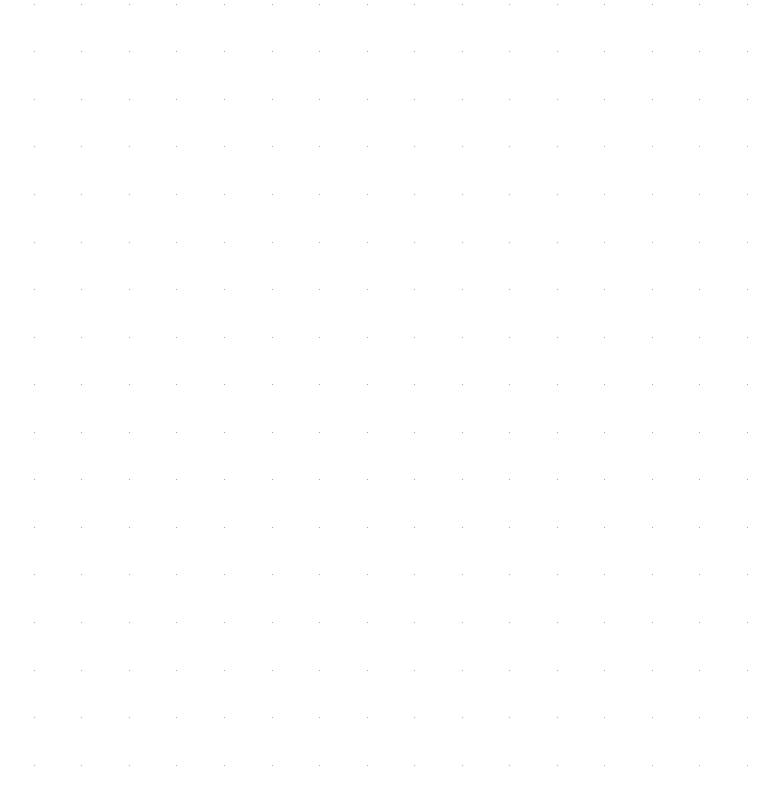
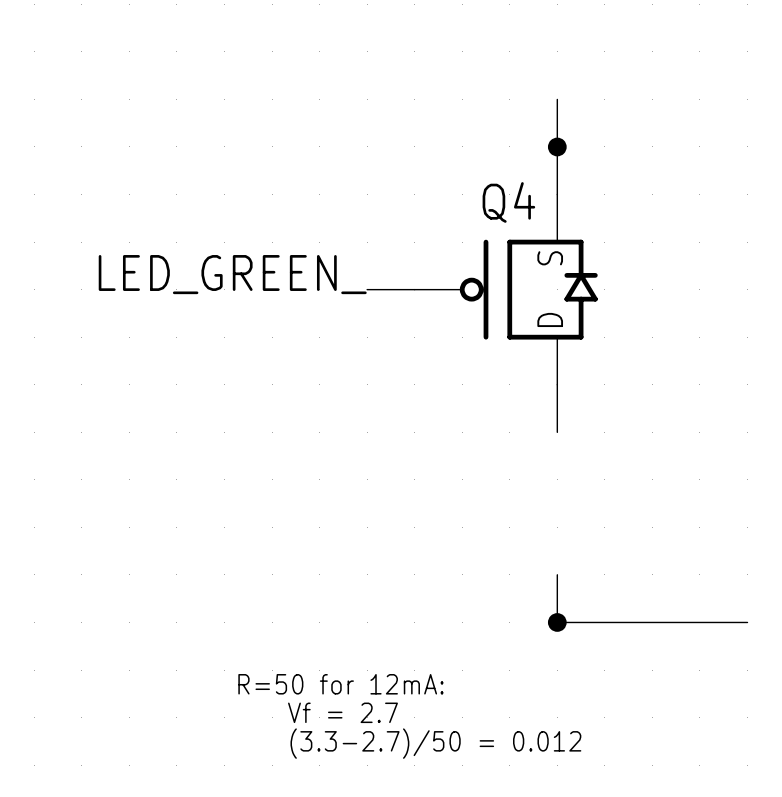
wire: none -> (557, 99) (557, 194)
junction: none -> (557, 146)
label: none -> LED_GREEN_ (232, 274)
wire: none -> (367, 289) (414, 289)
Q4: none -> (506, 289)
wire: none -> (557, 384) (557, 432)
wire: none -> (557, 574) (557, 622) (747, 622)
junction: none -> (557, 622)
text: none -> R=50 for 12mA: (340, 684)
text: none -> Vf = 2.7 (342, 712)
text: none -> (3.3-2.7)/50 = 0.012 (435, 743)

